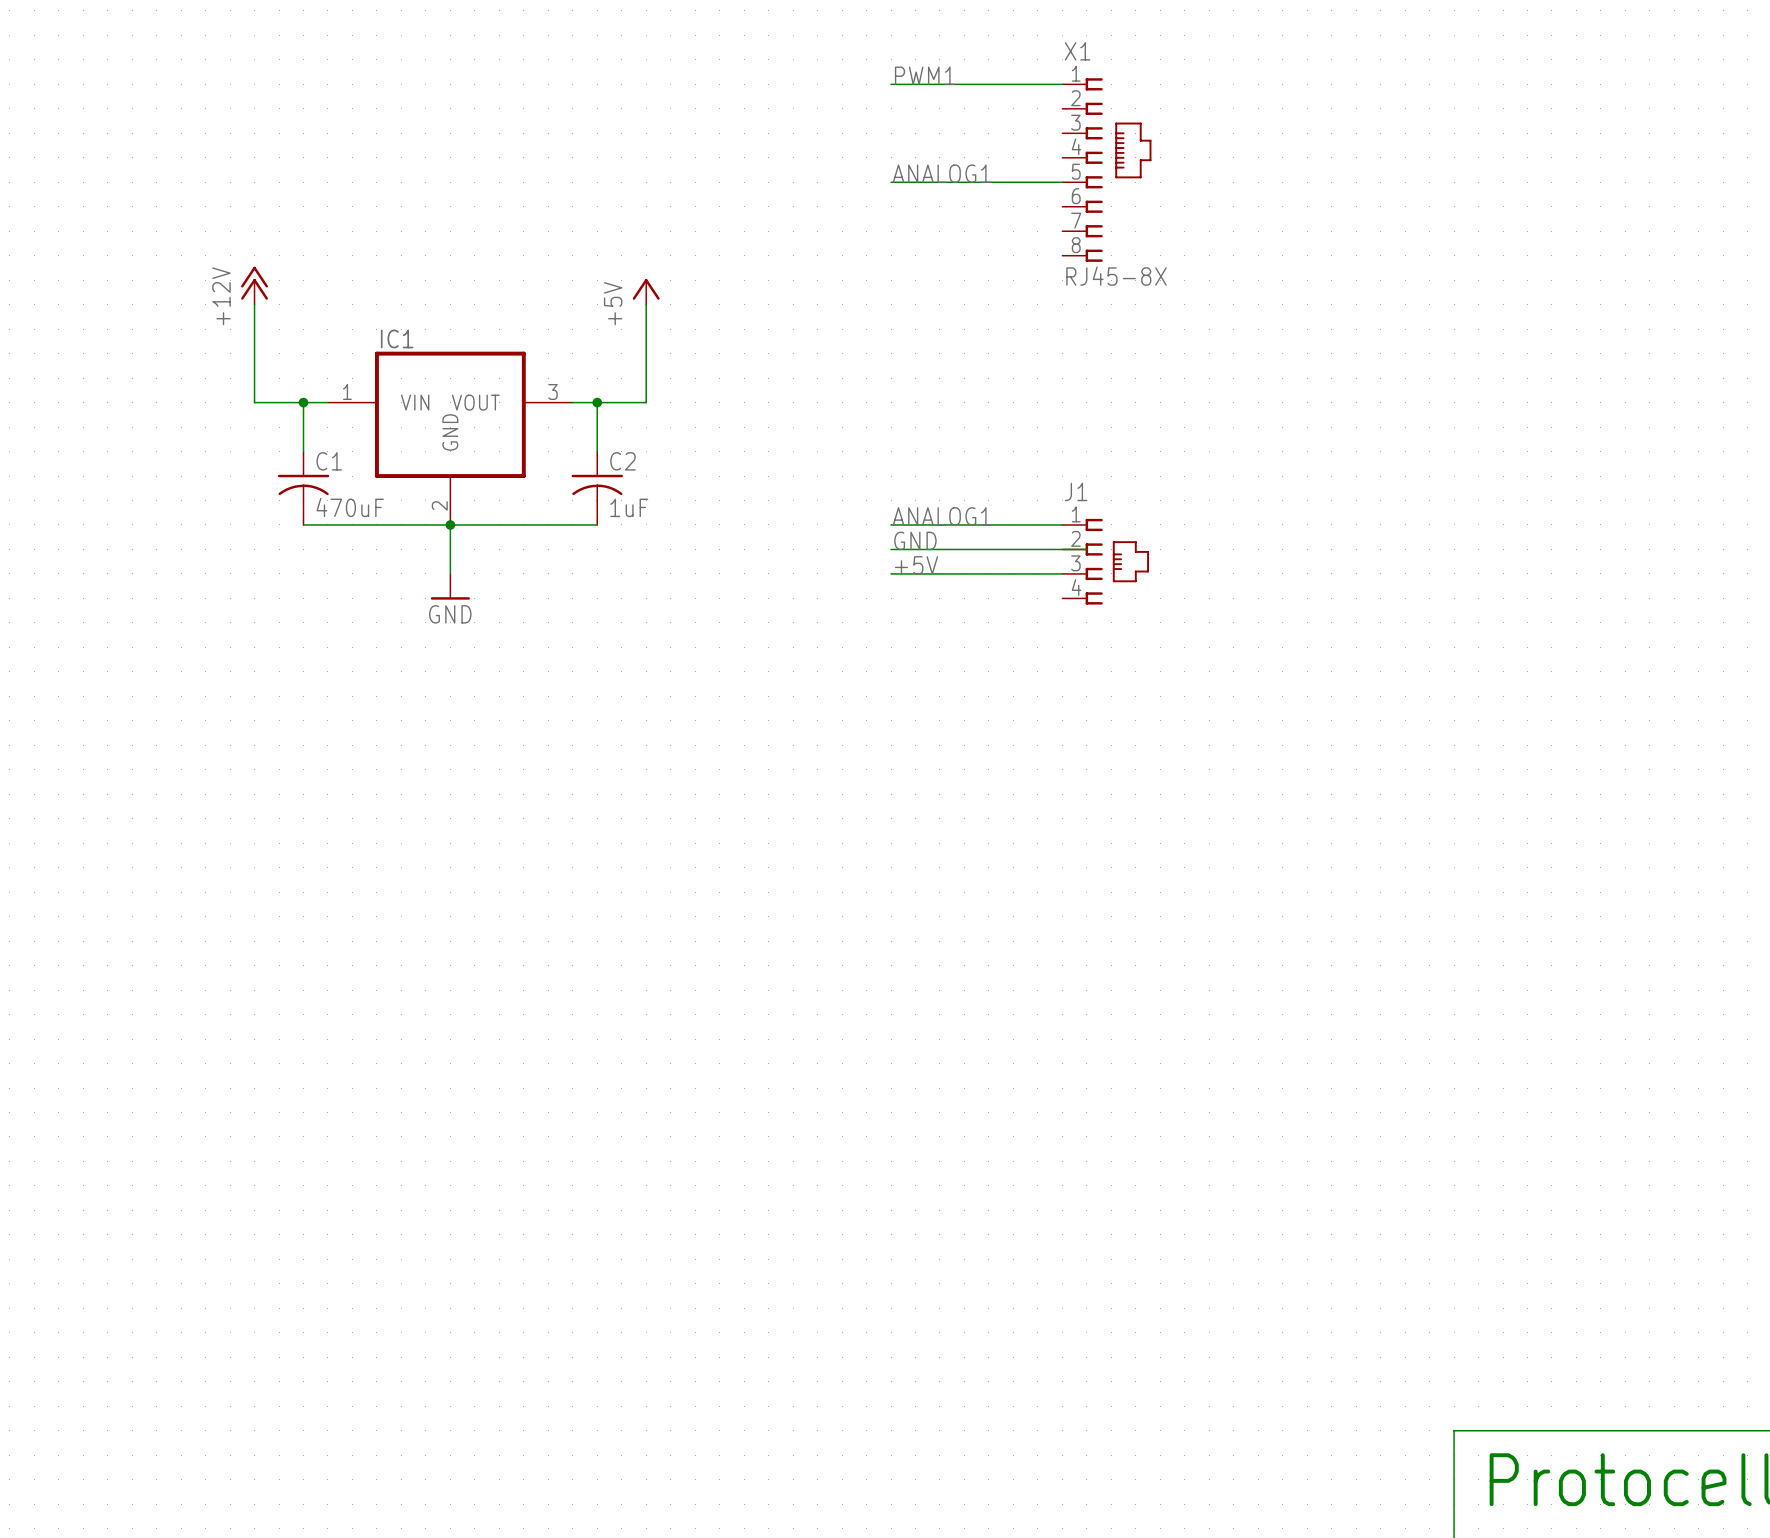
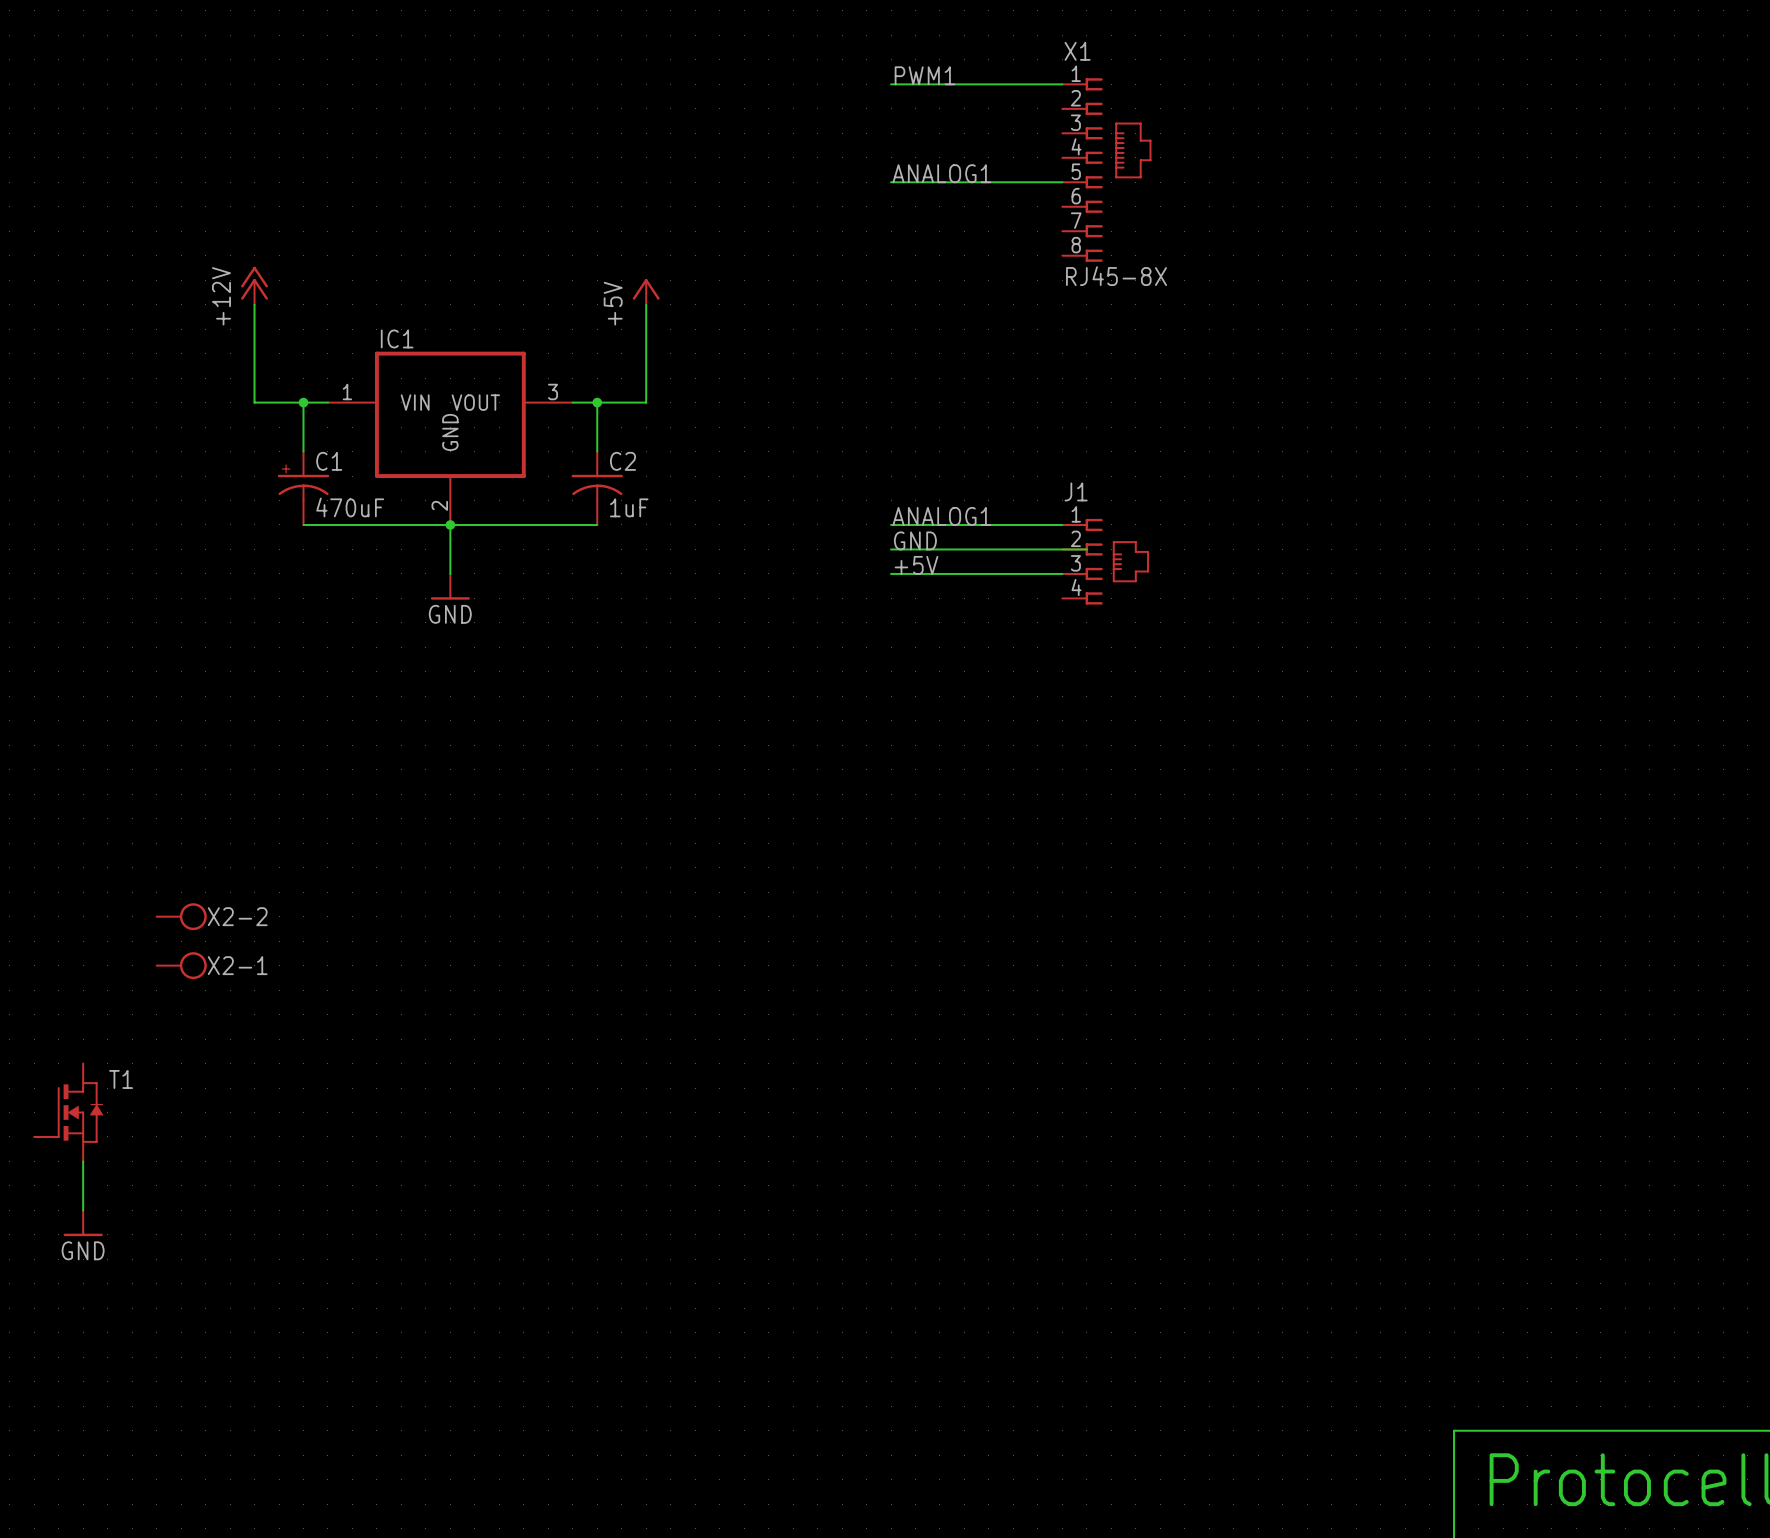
C1 symbol: [277, 451, 330, 525] -> [277, 451, 330, 525]
X2-2: none -> (181, 916)
X2-1: none -> (181, 965)
T1: none -> (68, 1112)
wire: none -> (83, 1161) (83, 1210)
power symbol: none -> GND (83, 1223)

